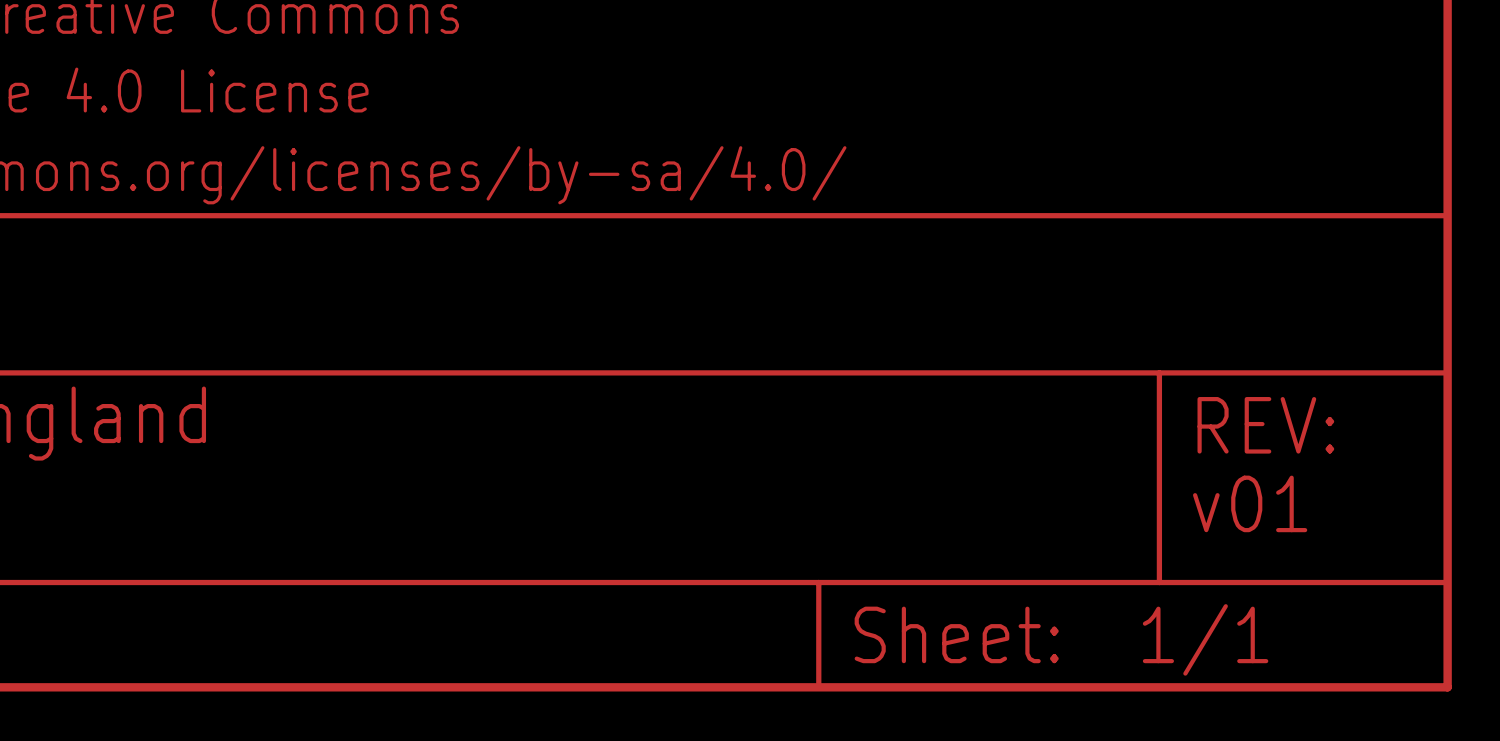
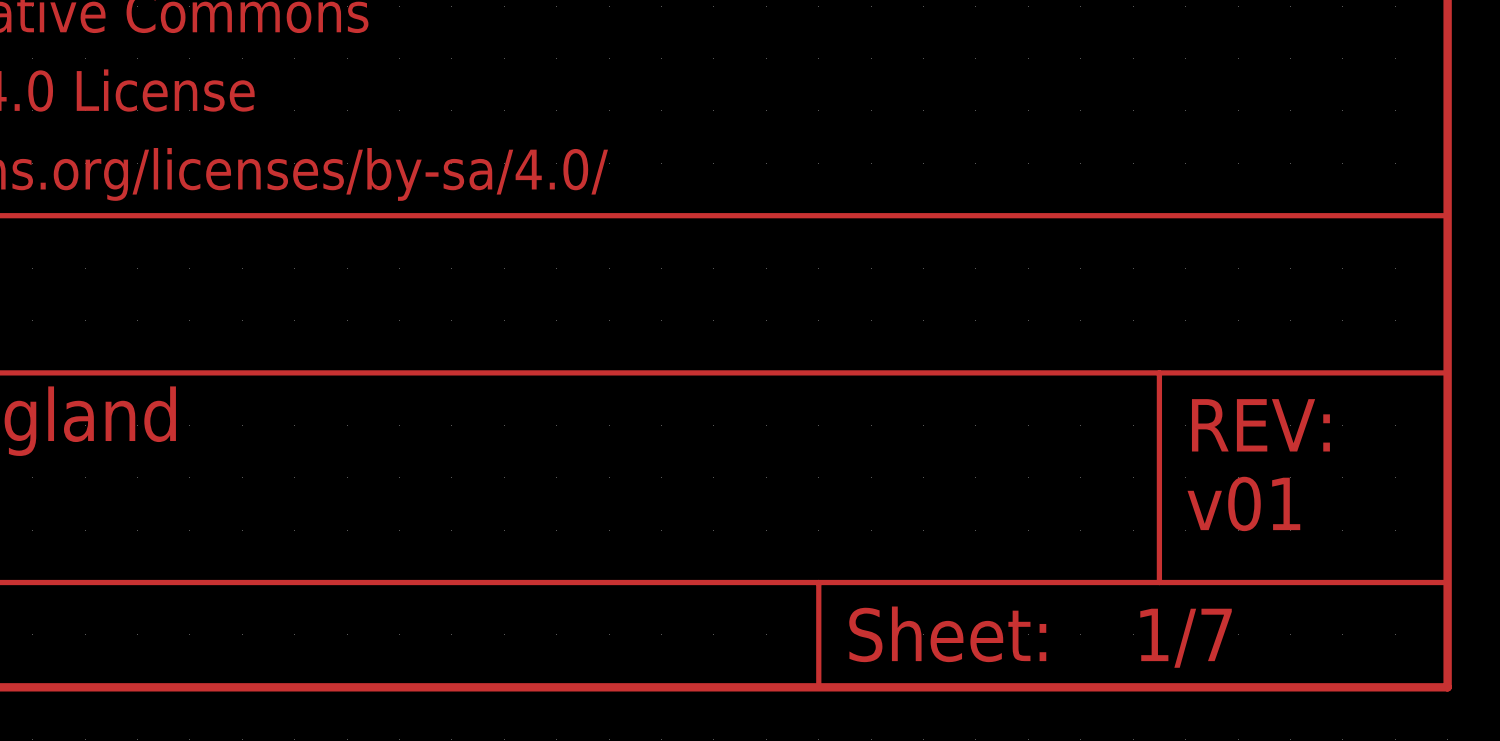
part text: 1/1 (1205, 639) -> 1/7 (1186, 638)

